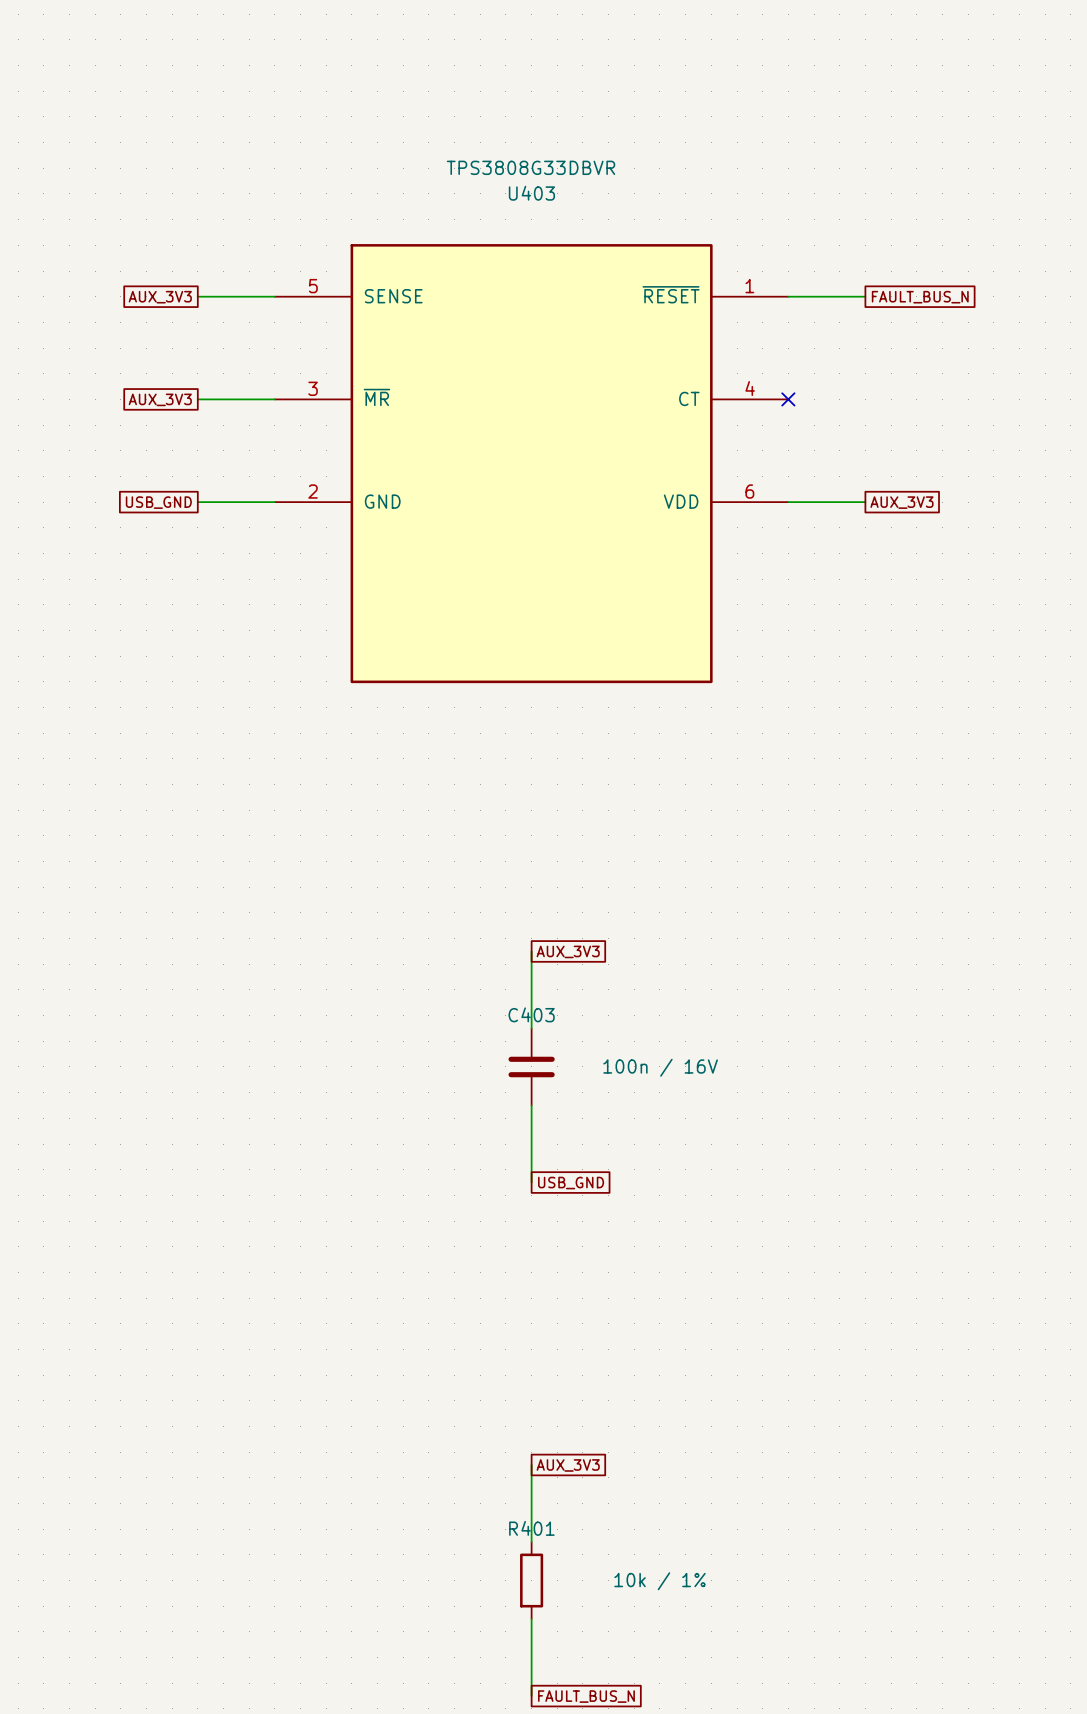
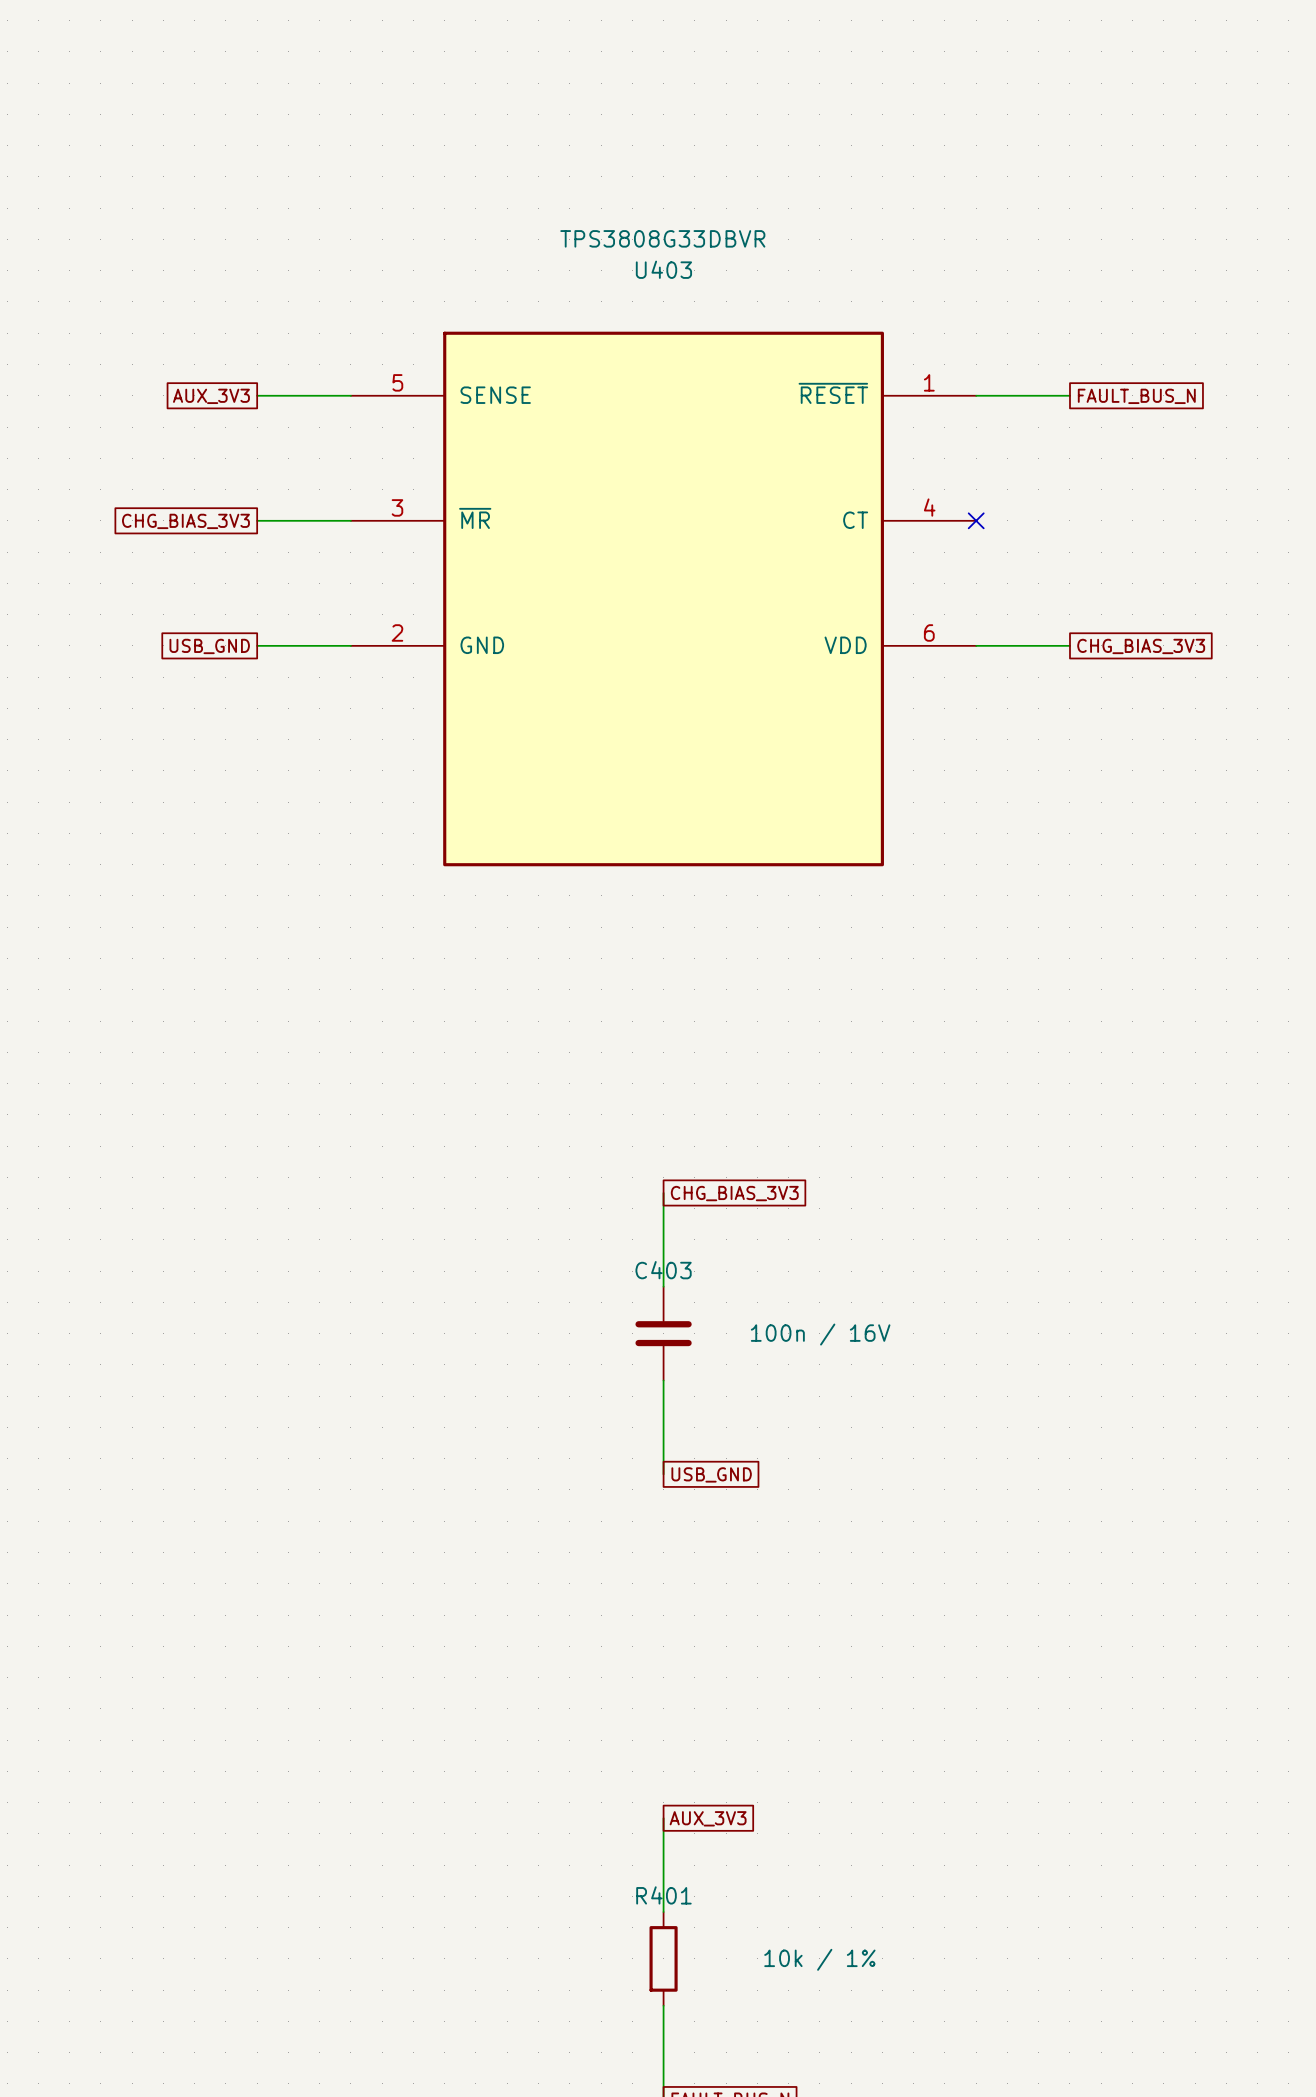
global label: AUX_3V3 (160, 399) -> CHG_BIAS_3V3 (185, 521)
global label: AUX_3V3 (901, 502) -> CHG_BIAS_3V3 (1141, 646)
global label: AUX_3V3 (568, 951) -> CHG_BIAS_3V3 (734, 1193)

